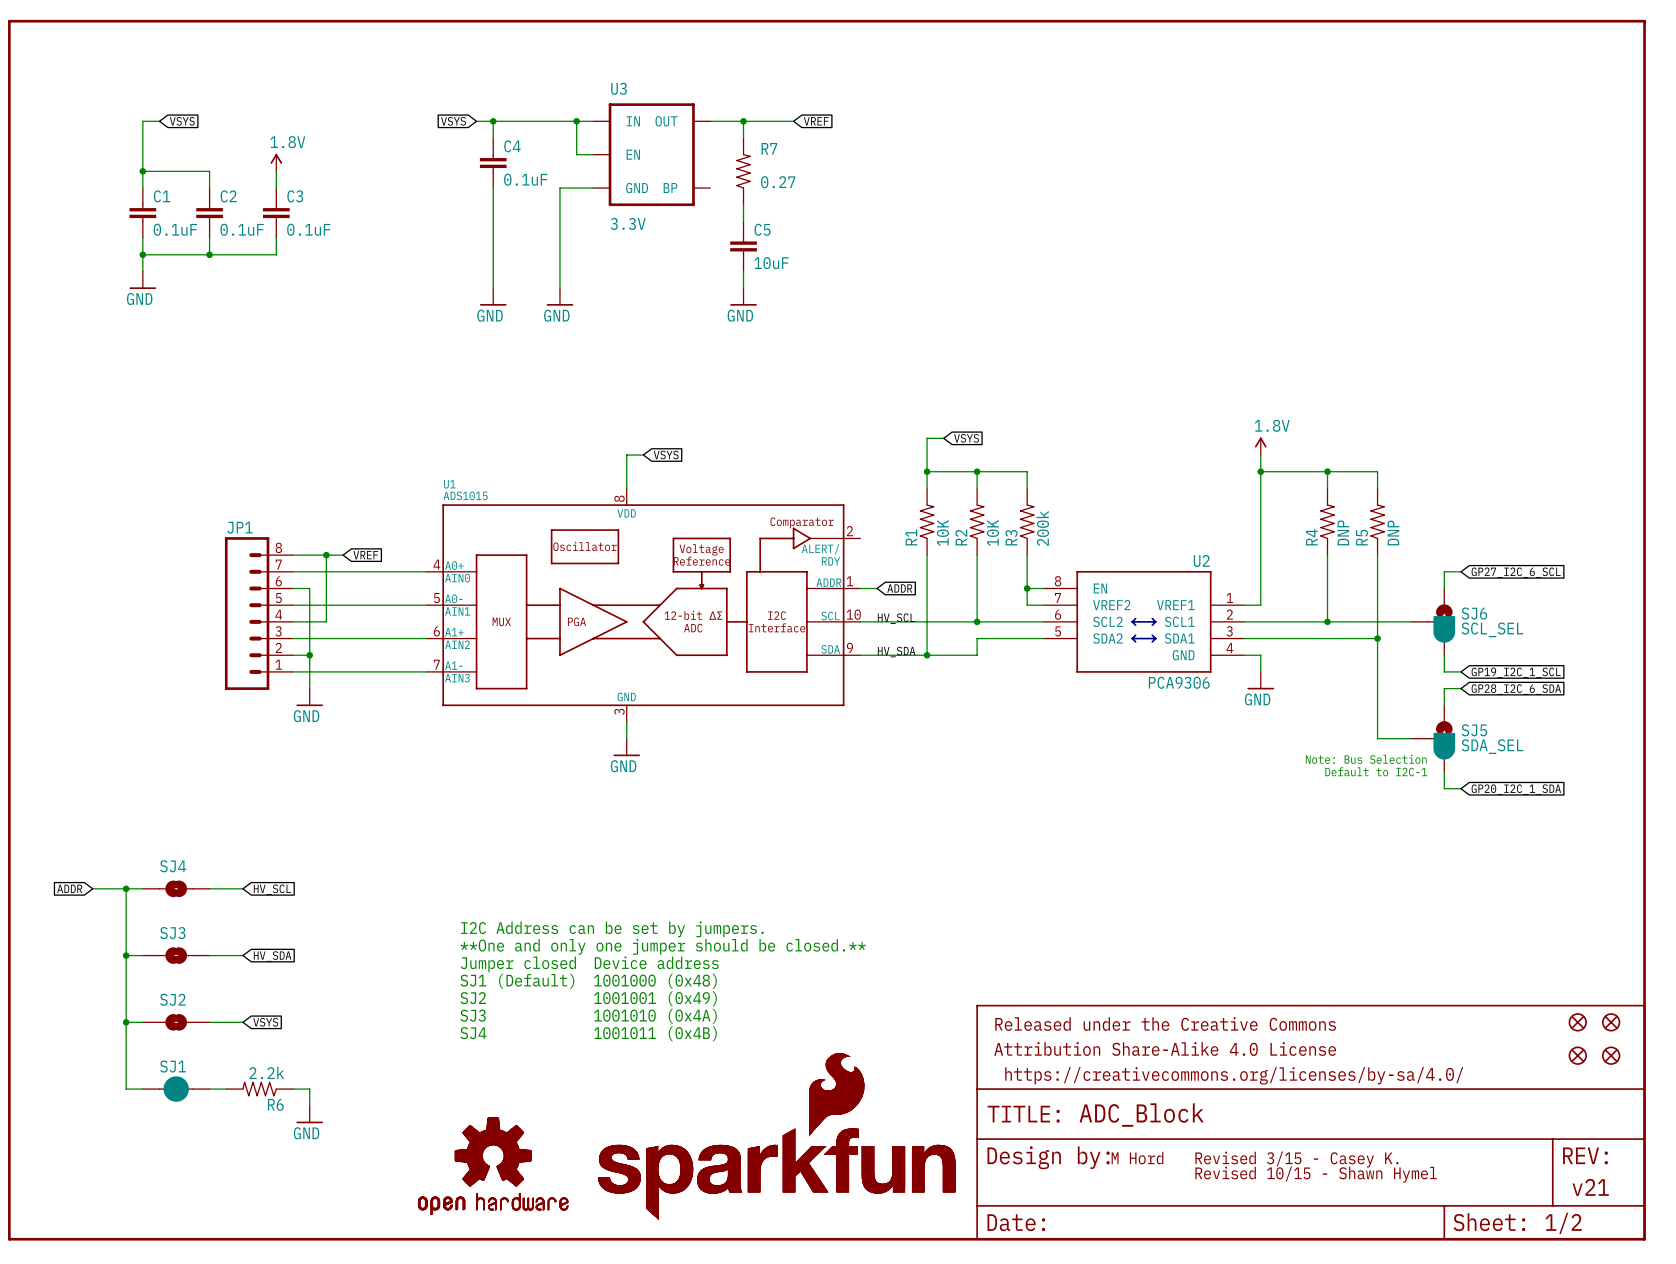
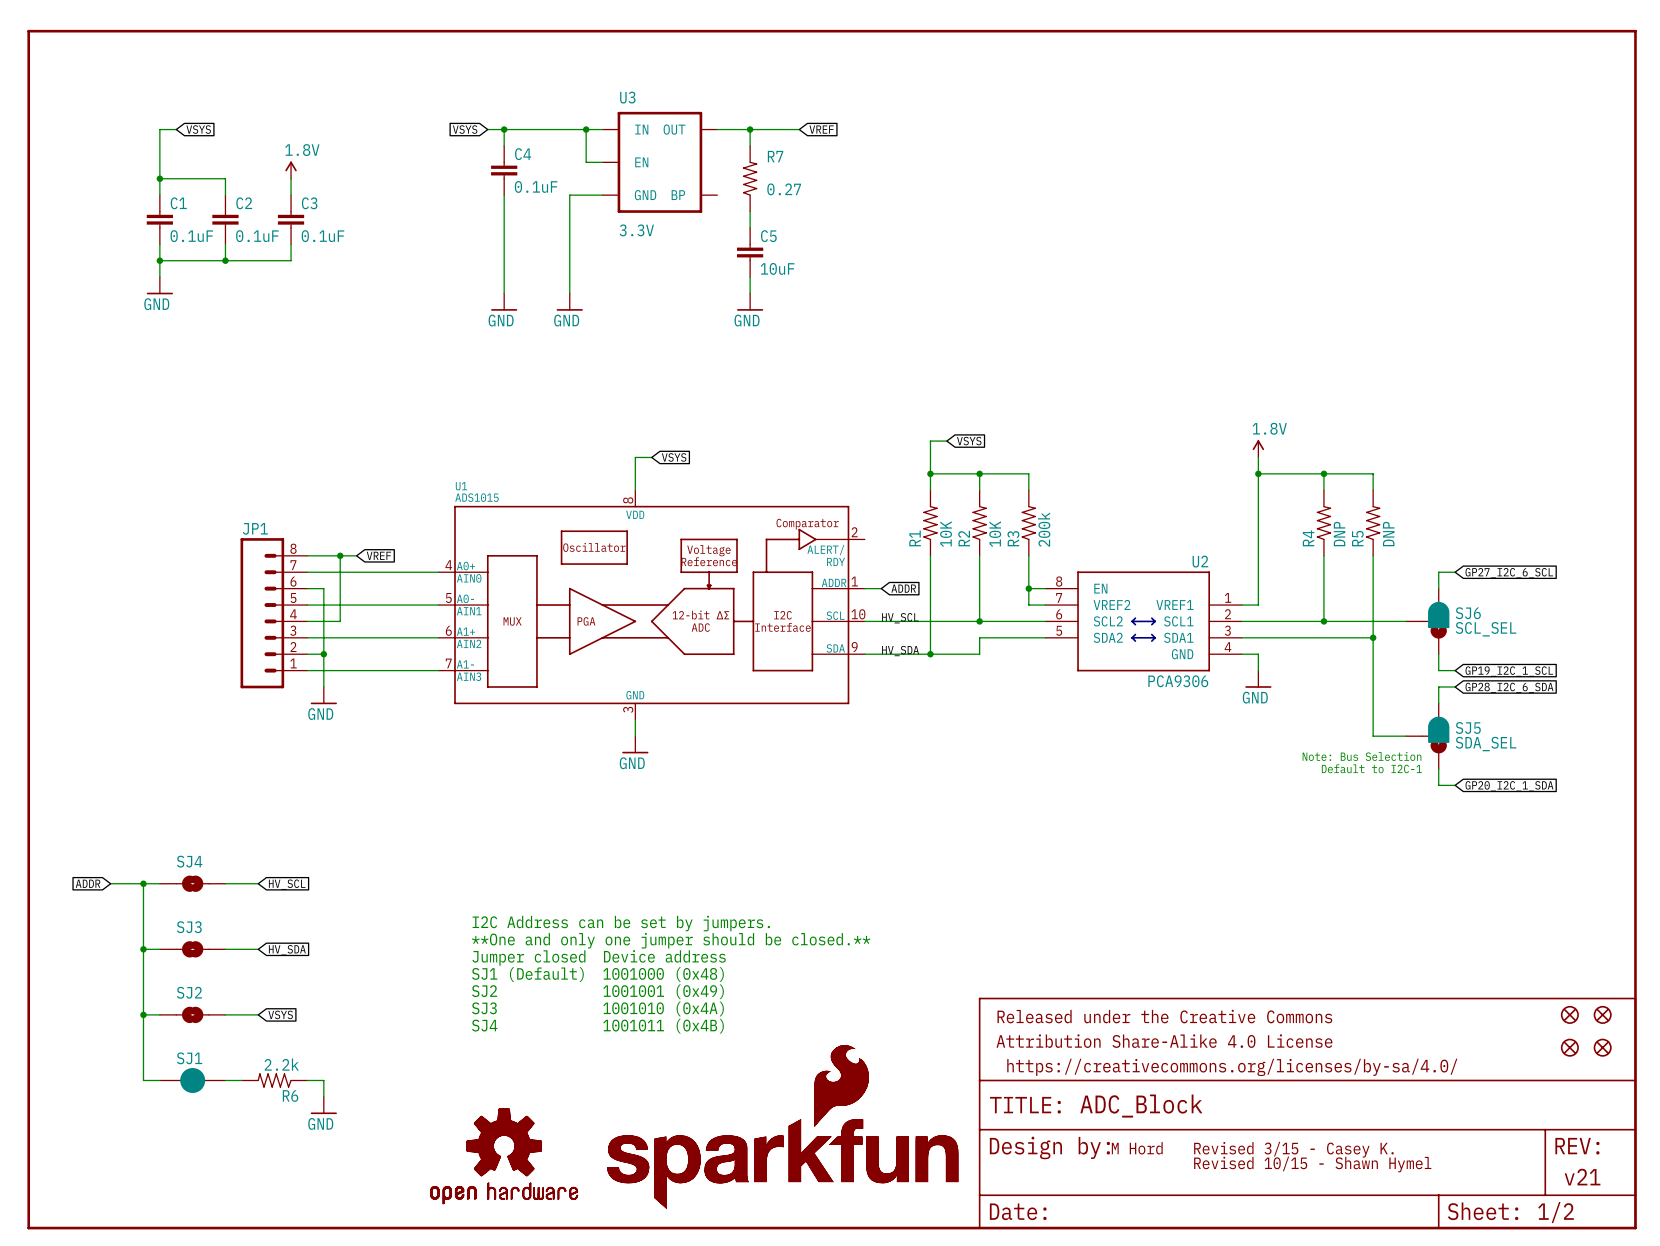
SJ6 symbol: [1410, 588, 1456, 656] -> [1405, 588, 1450, 655]
SJ5 symbol: [1410, 705, 1456, 773] -> [1405, 703, 1450, 769]

